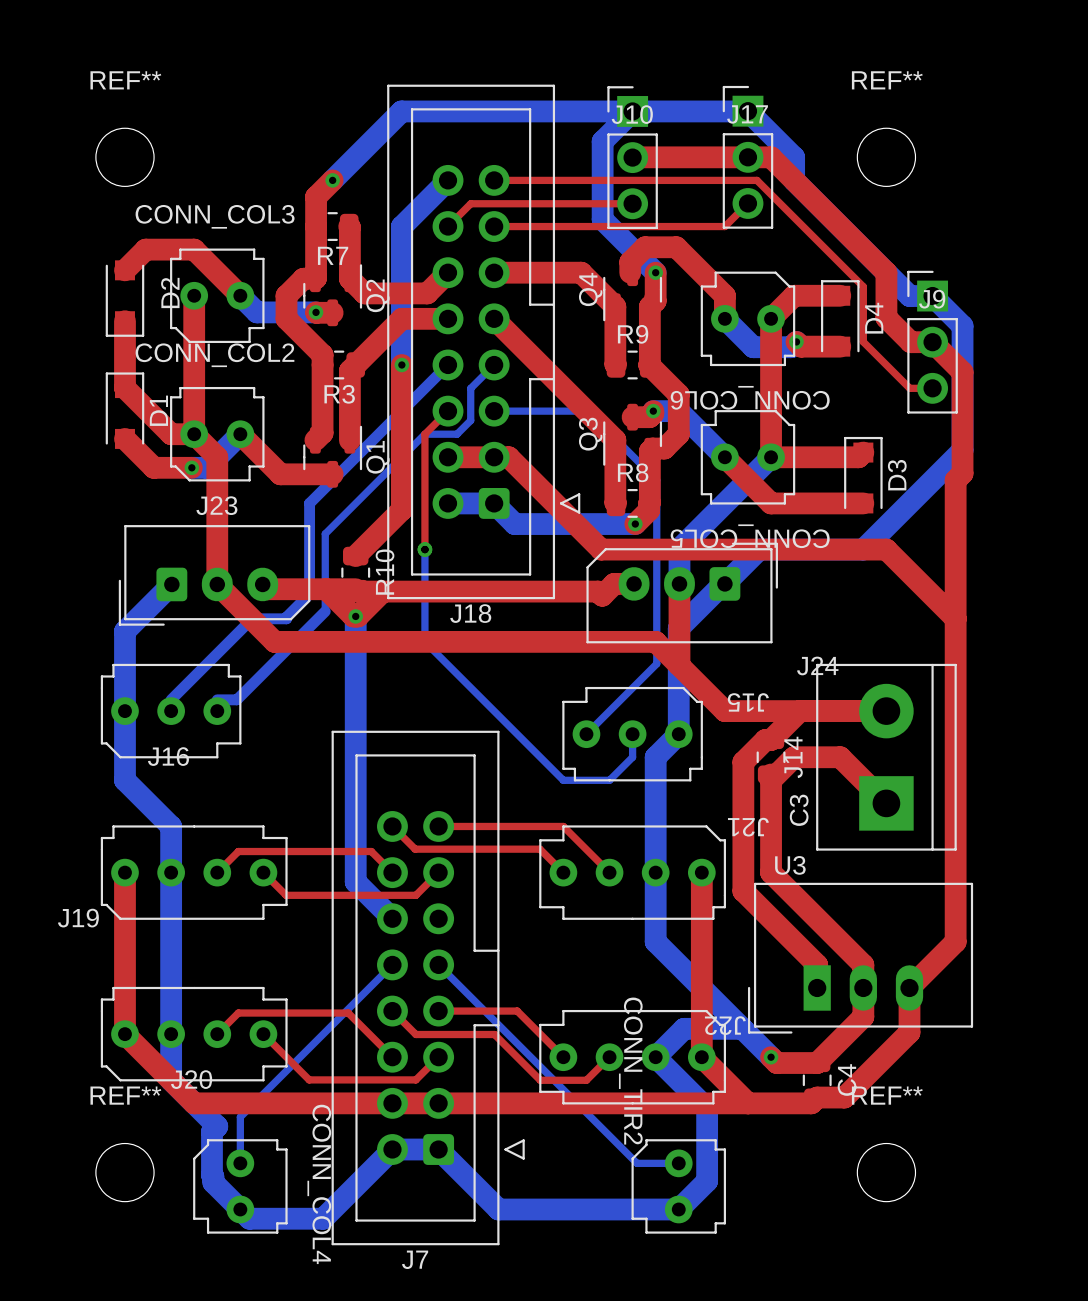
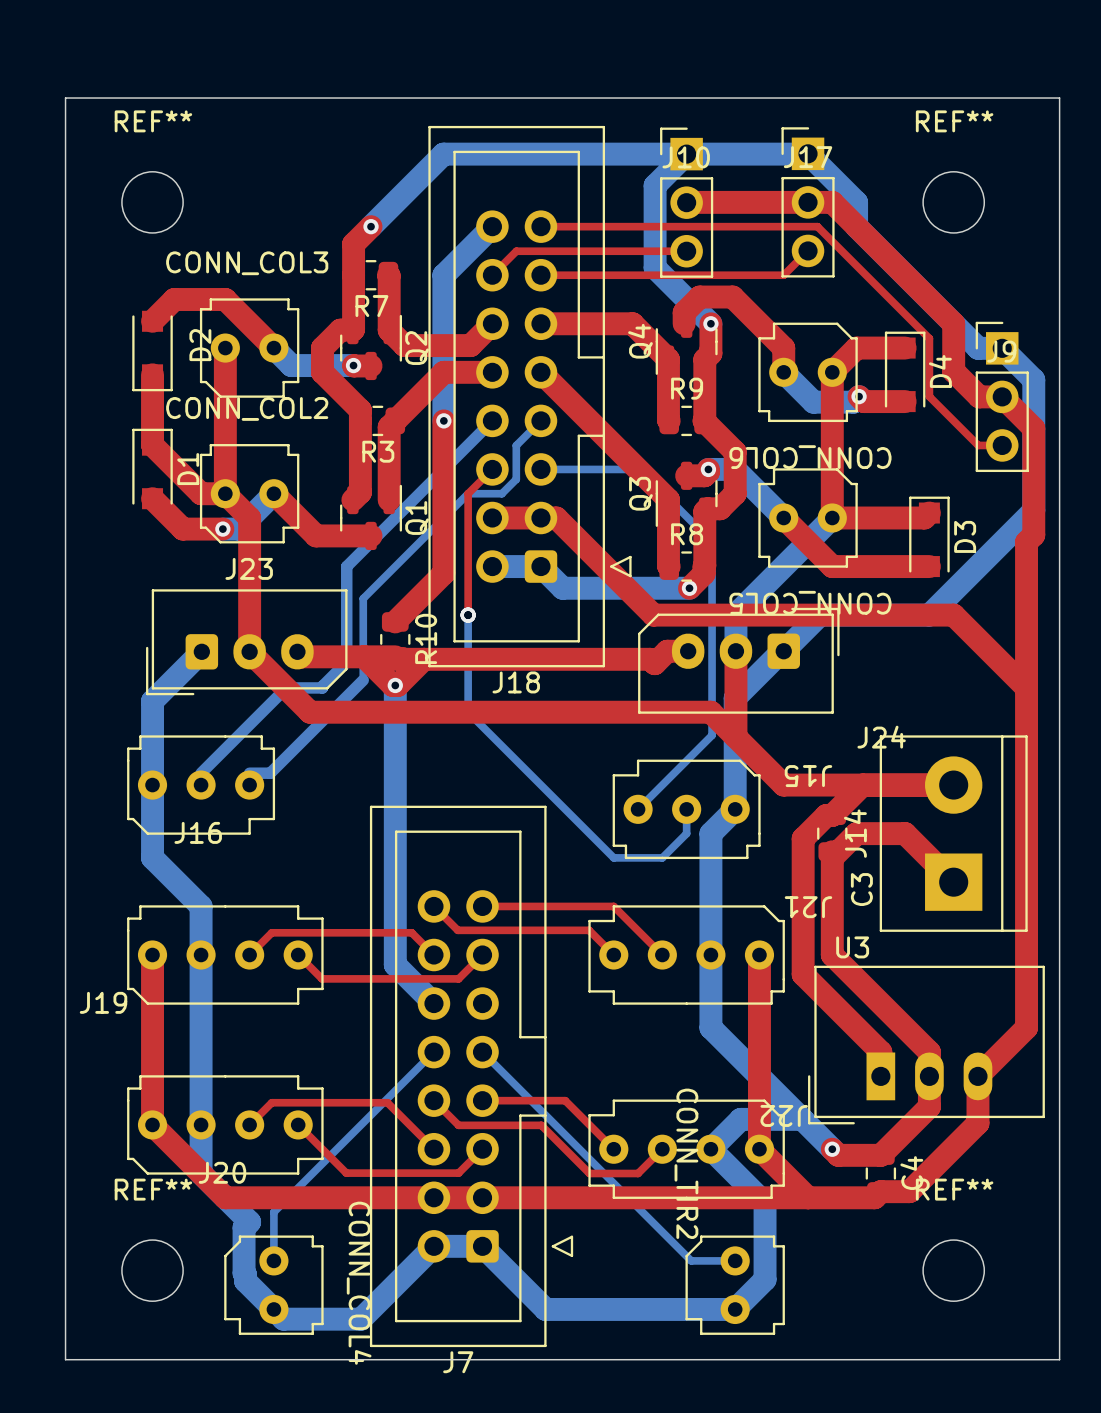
board edge: none -> (65, 98) (1059, 98) (1059, 1359) (65, 1359) (65, 98)

